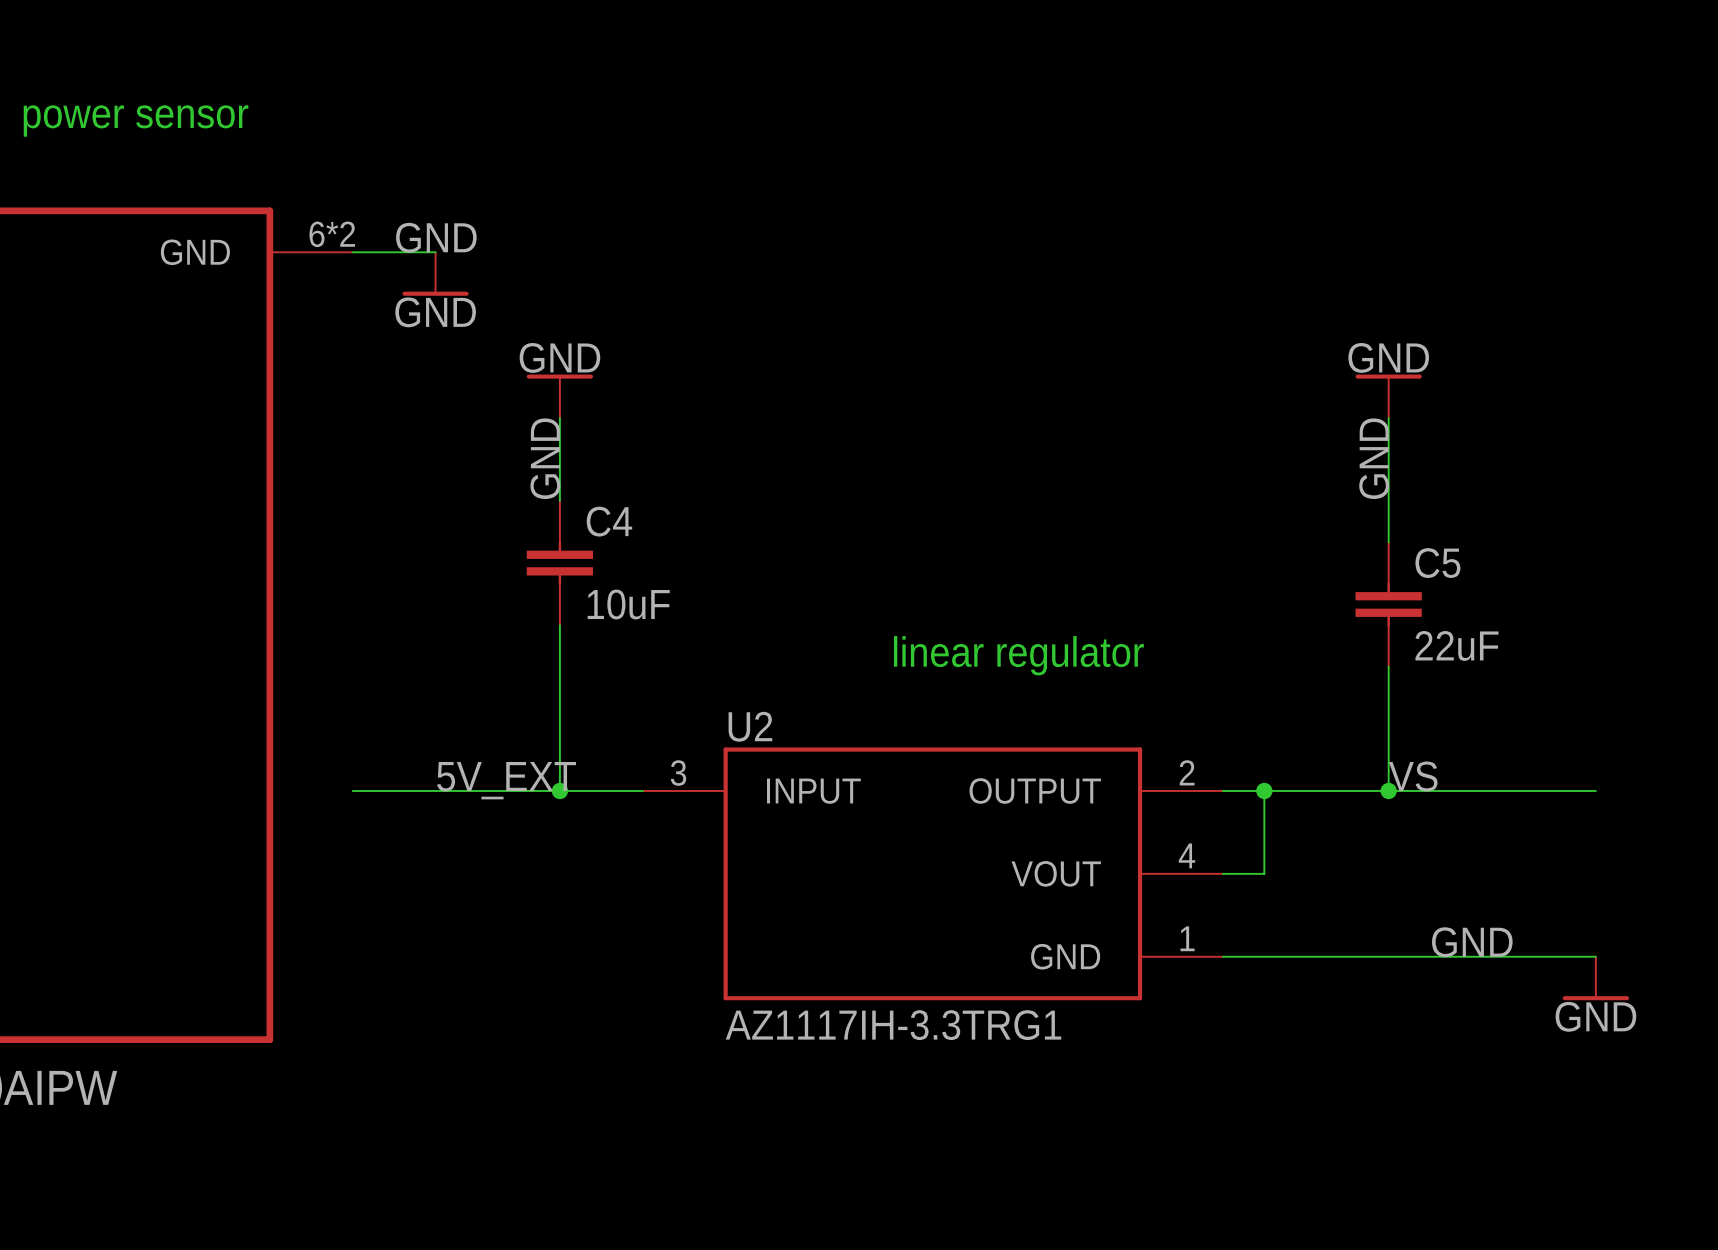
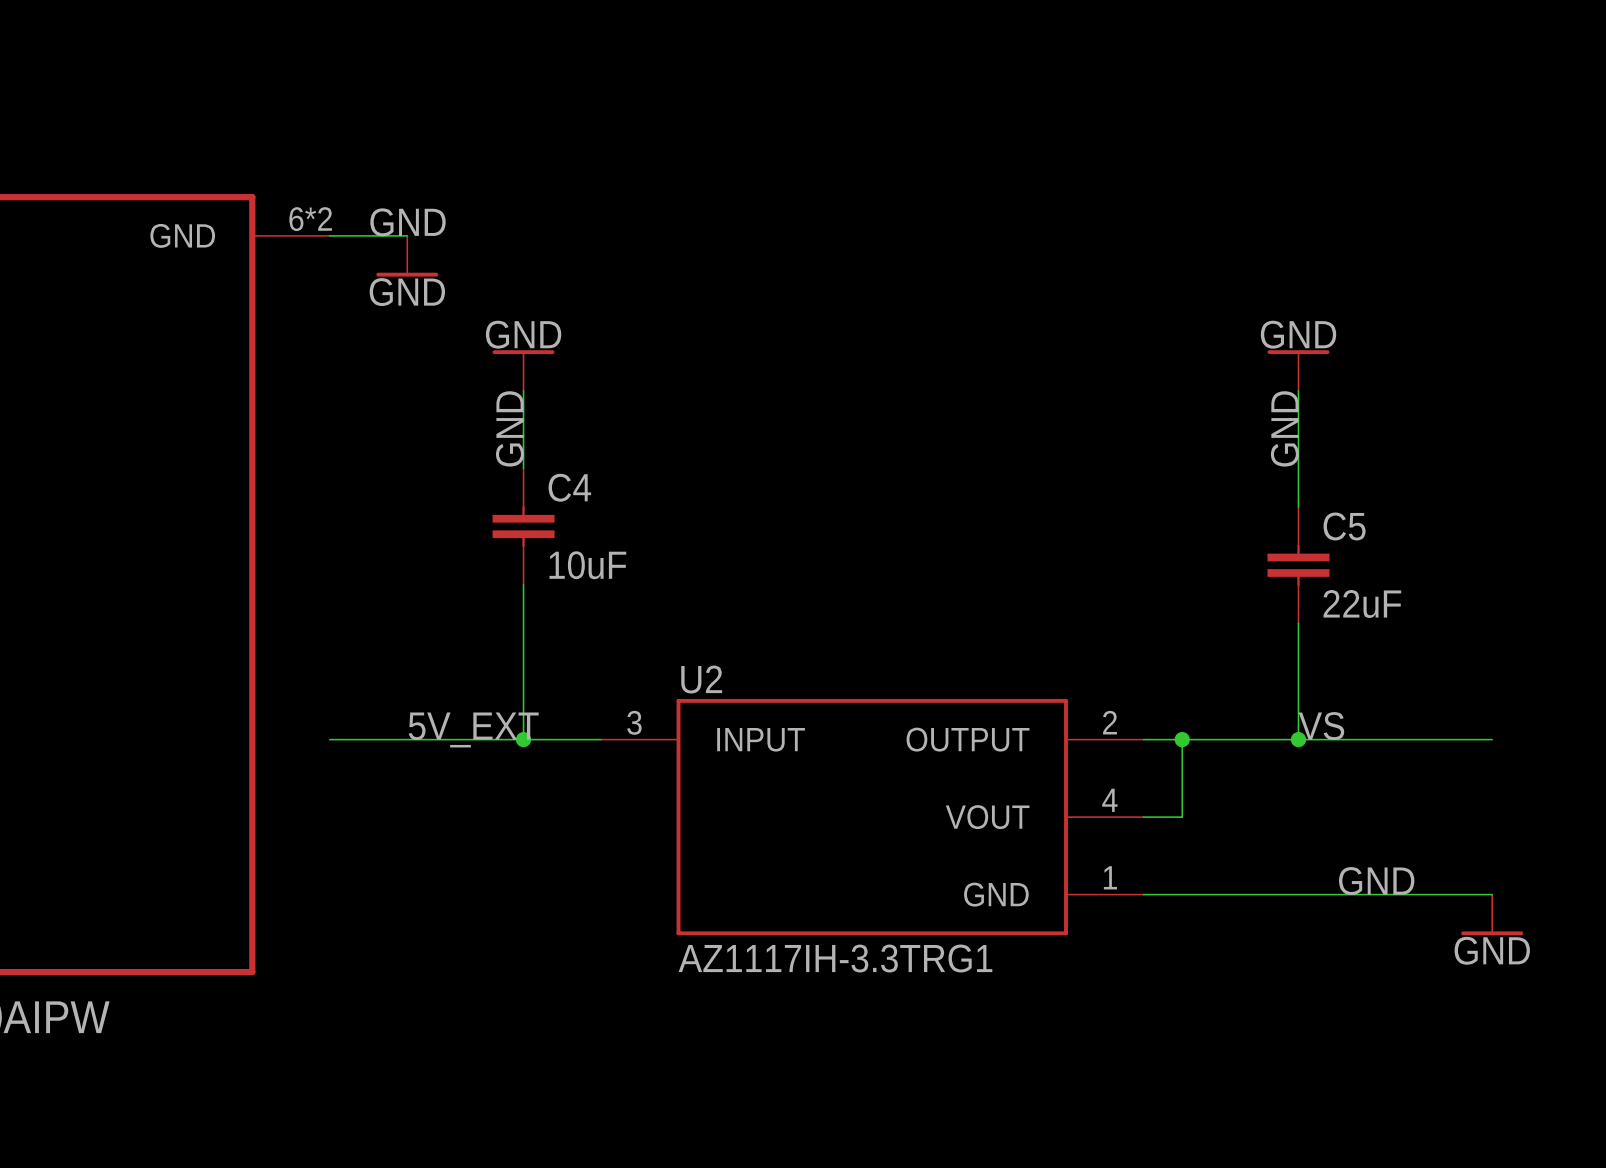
text: power sensor (136, 121) -> none
text: linear regulator (1018, 655) -> none

